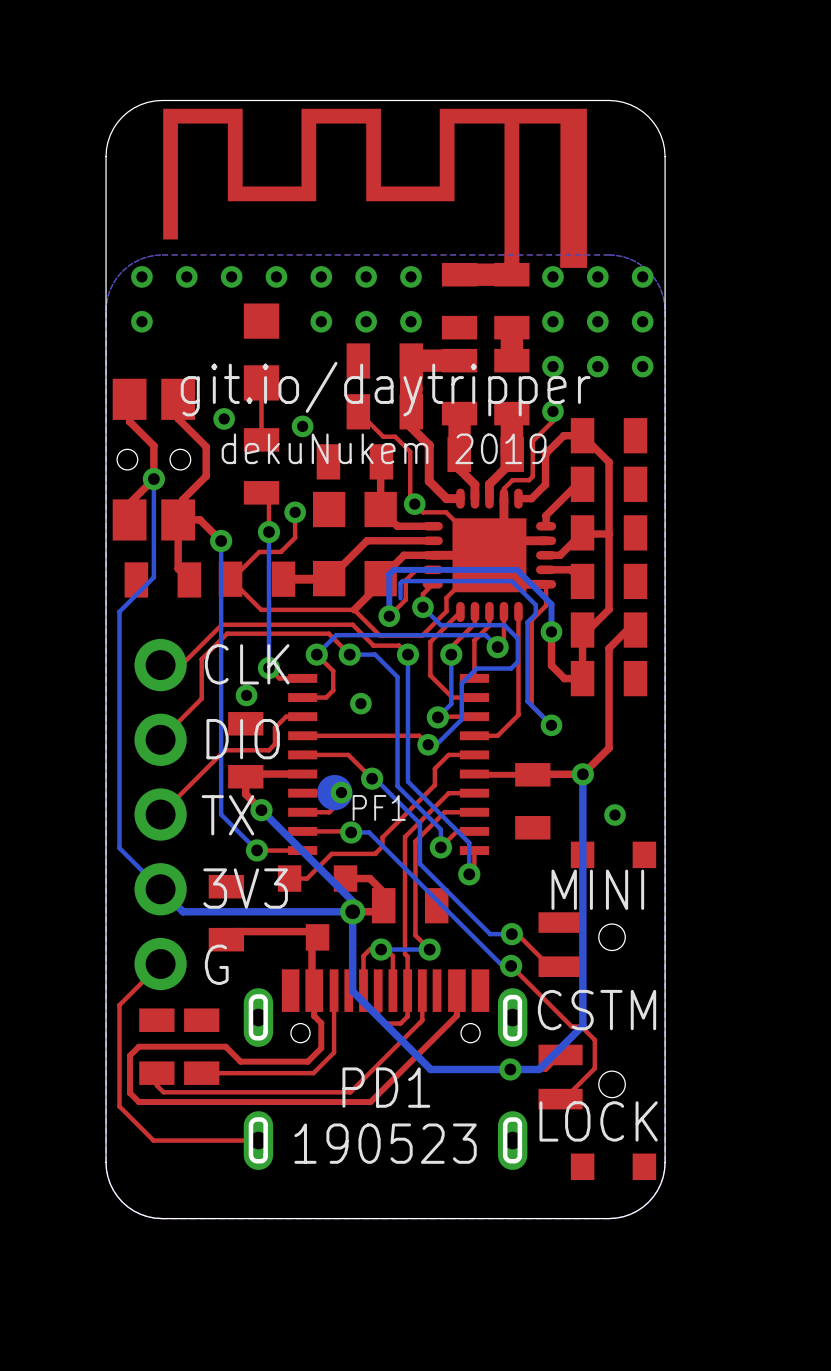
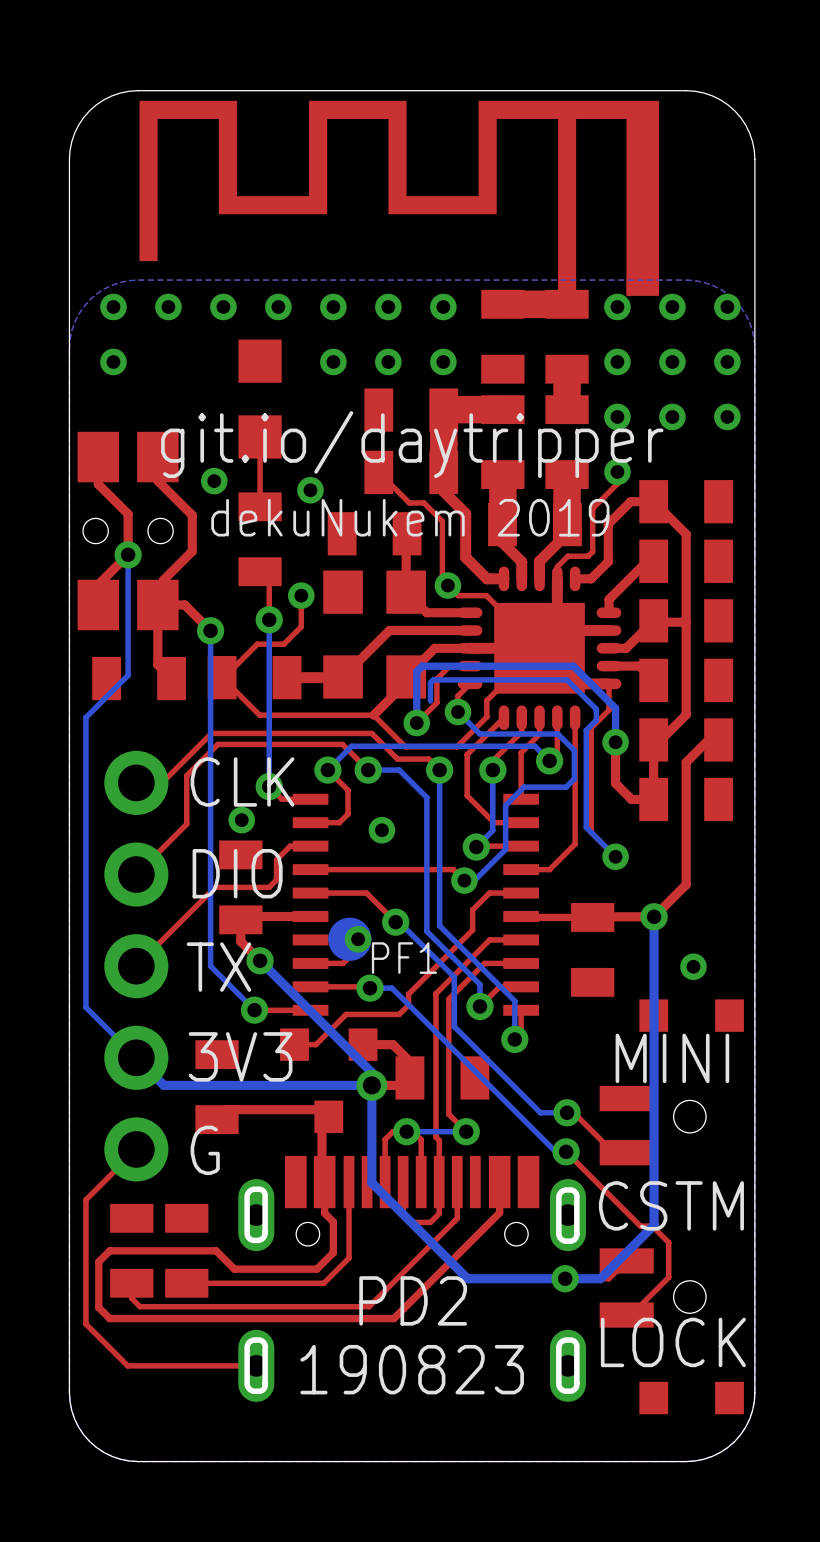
text: PD1 (386, 1087) -> PD2 (413, 1300)
text: 190523 (385, 1143) -> 190823 (412, 1369)

